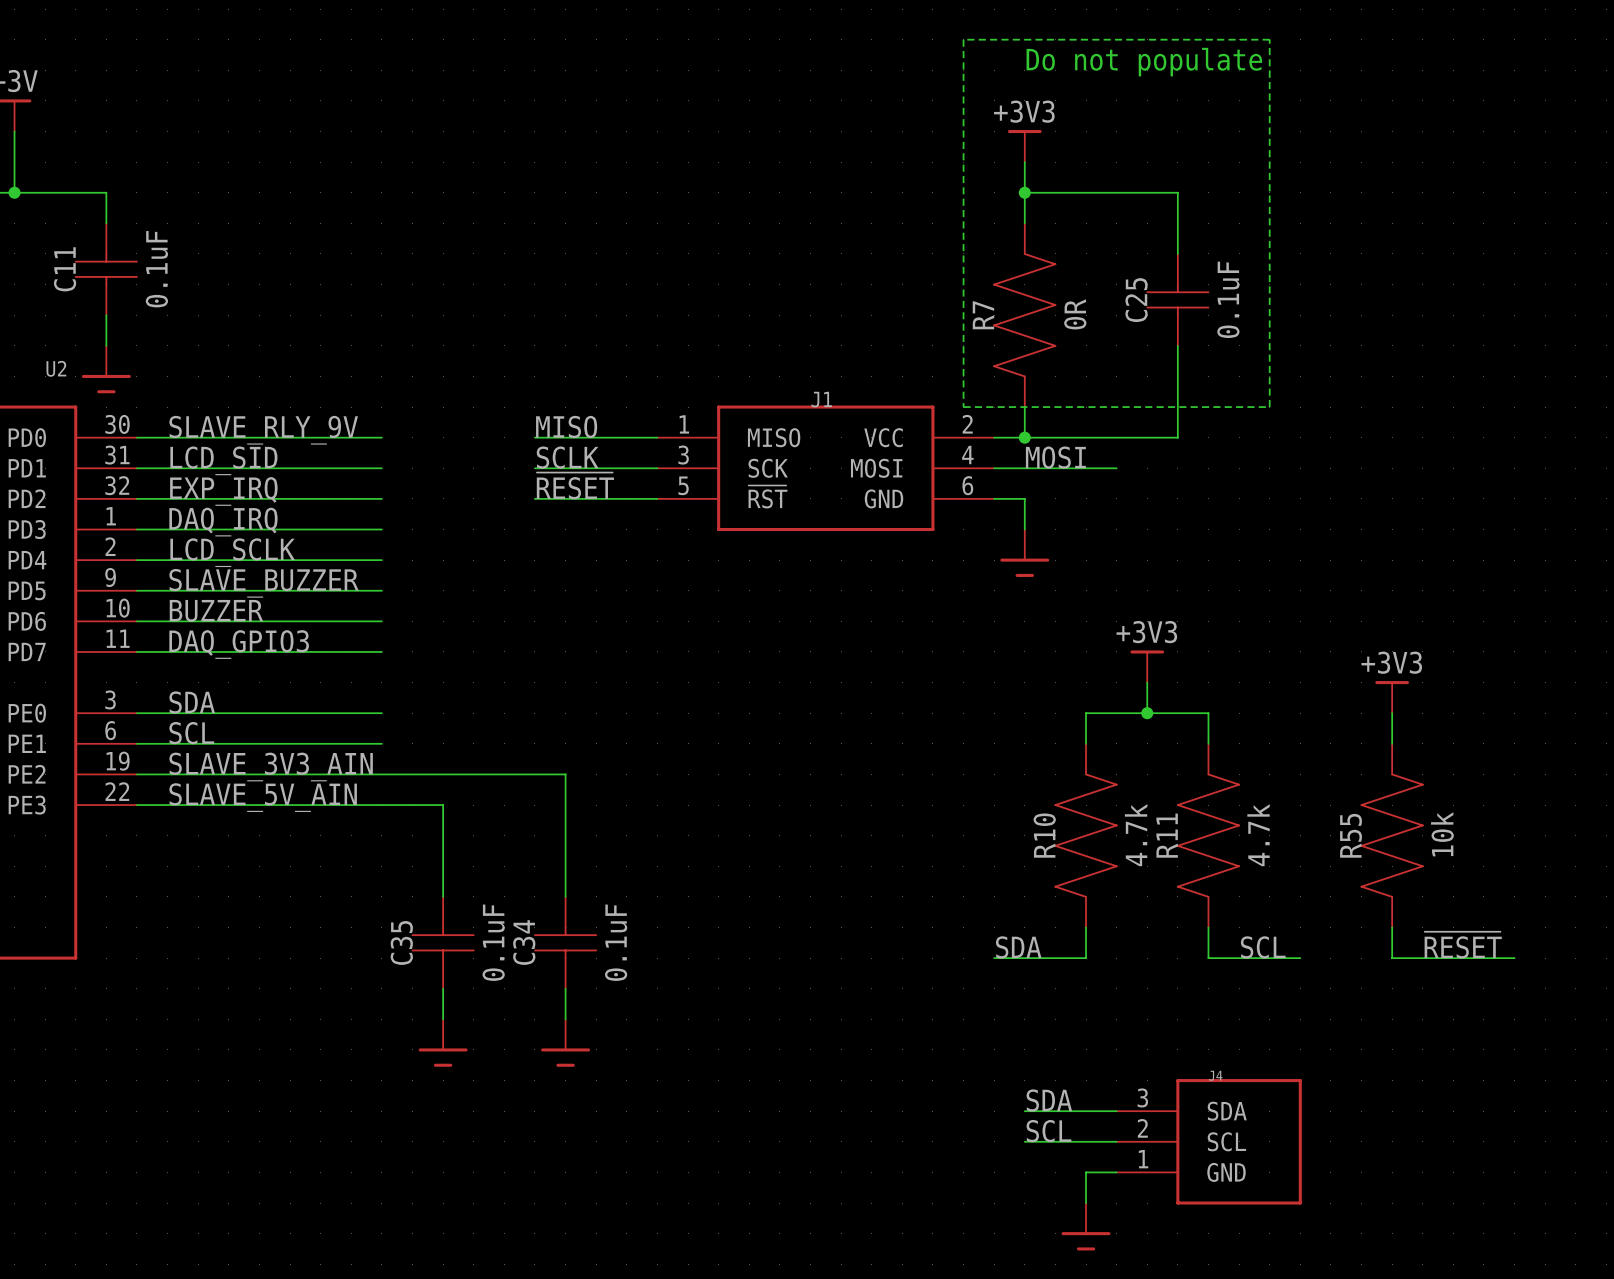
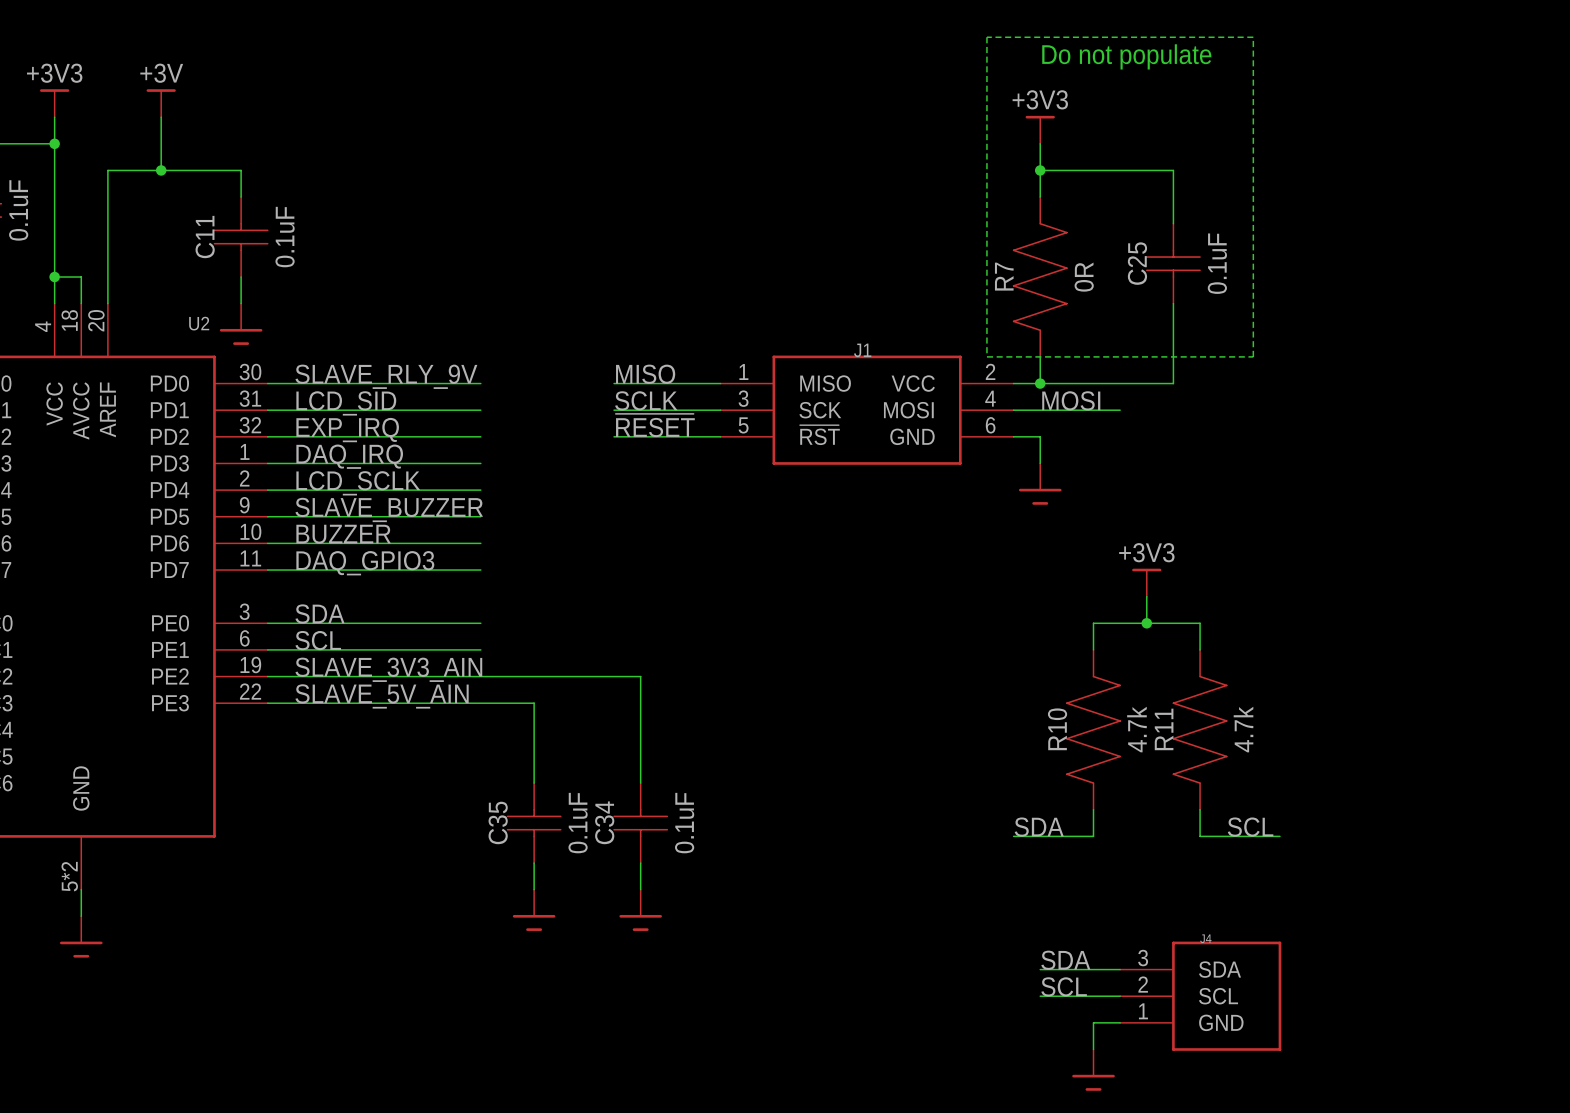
power symbol: +3V3 (1392, 697) -> none
wire: (1392, 713) (1392, 743) -> none
R55: 10k (1392, 835) -> none
wire: (1392, 927) (1392, 958) (1514, 958) -> none
label: ~{RESET} (1463, 945) -> none

